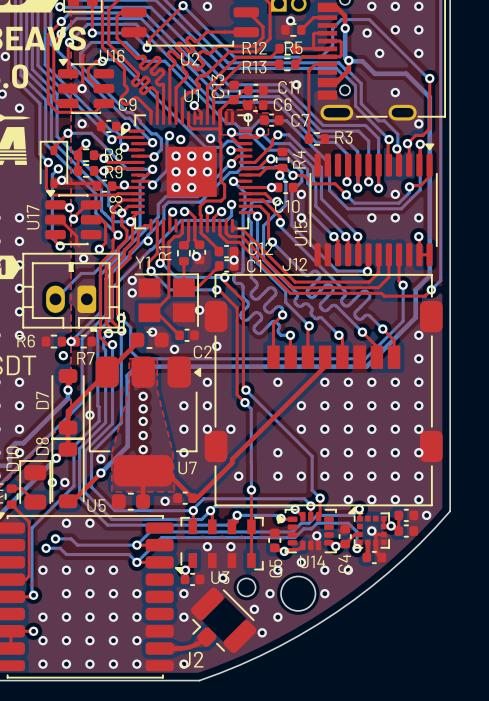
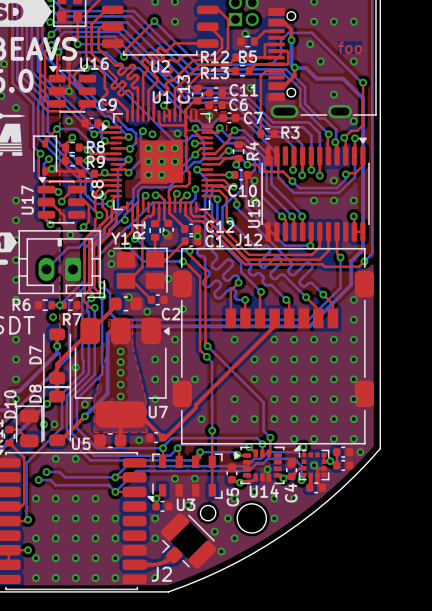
via: (395, 29) -> none
via: (418, 29) -> none
text: none -> foo (350, 47)

